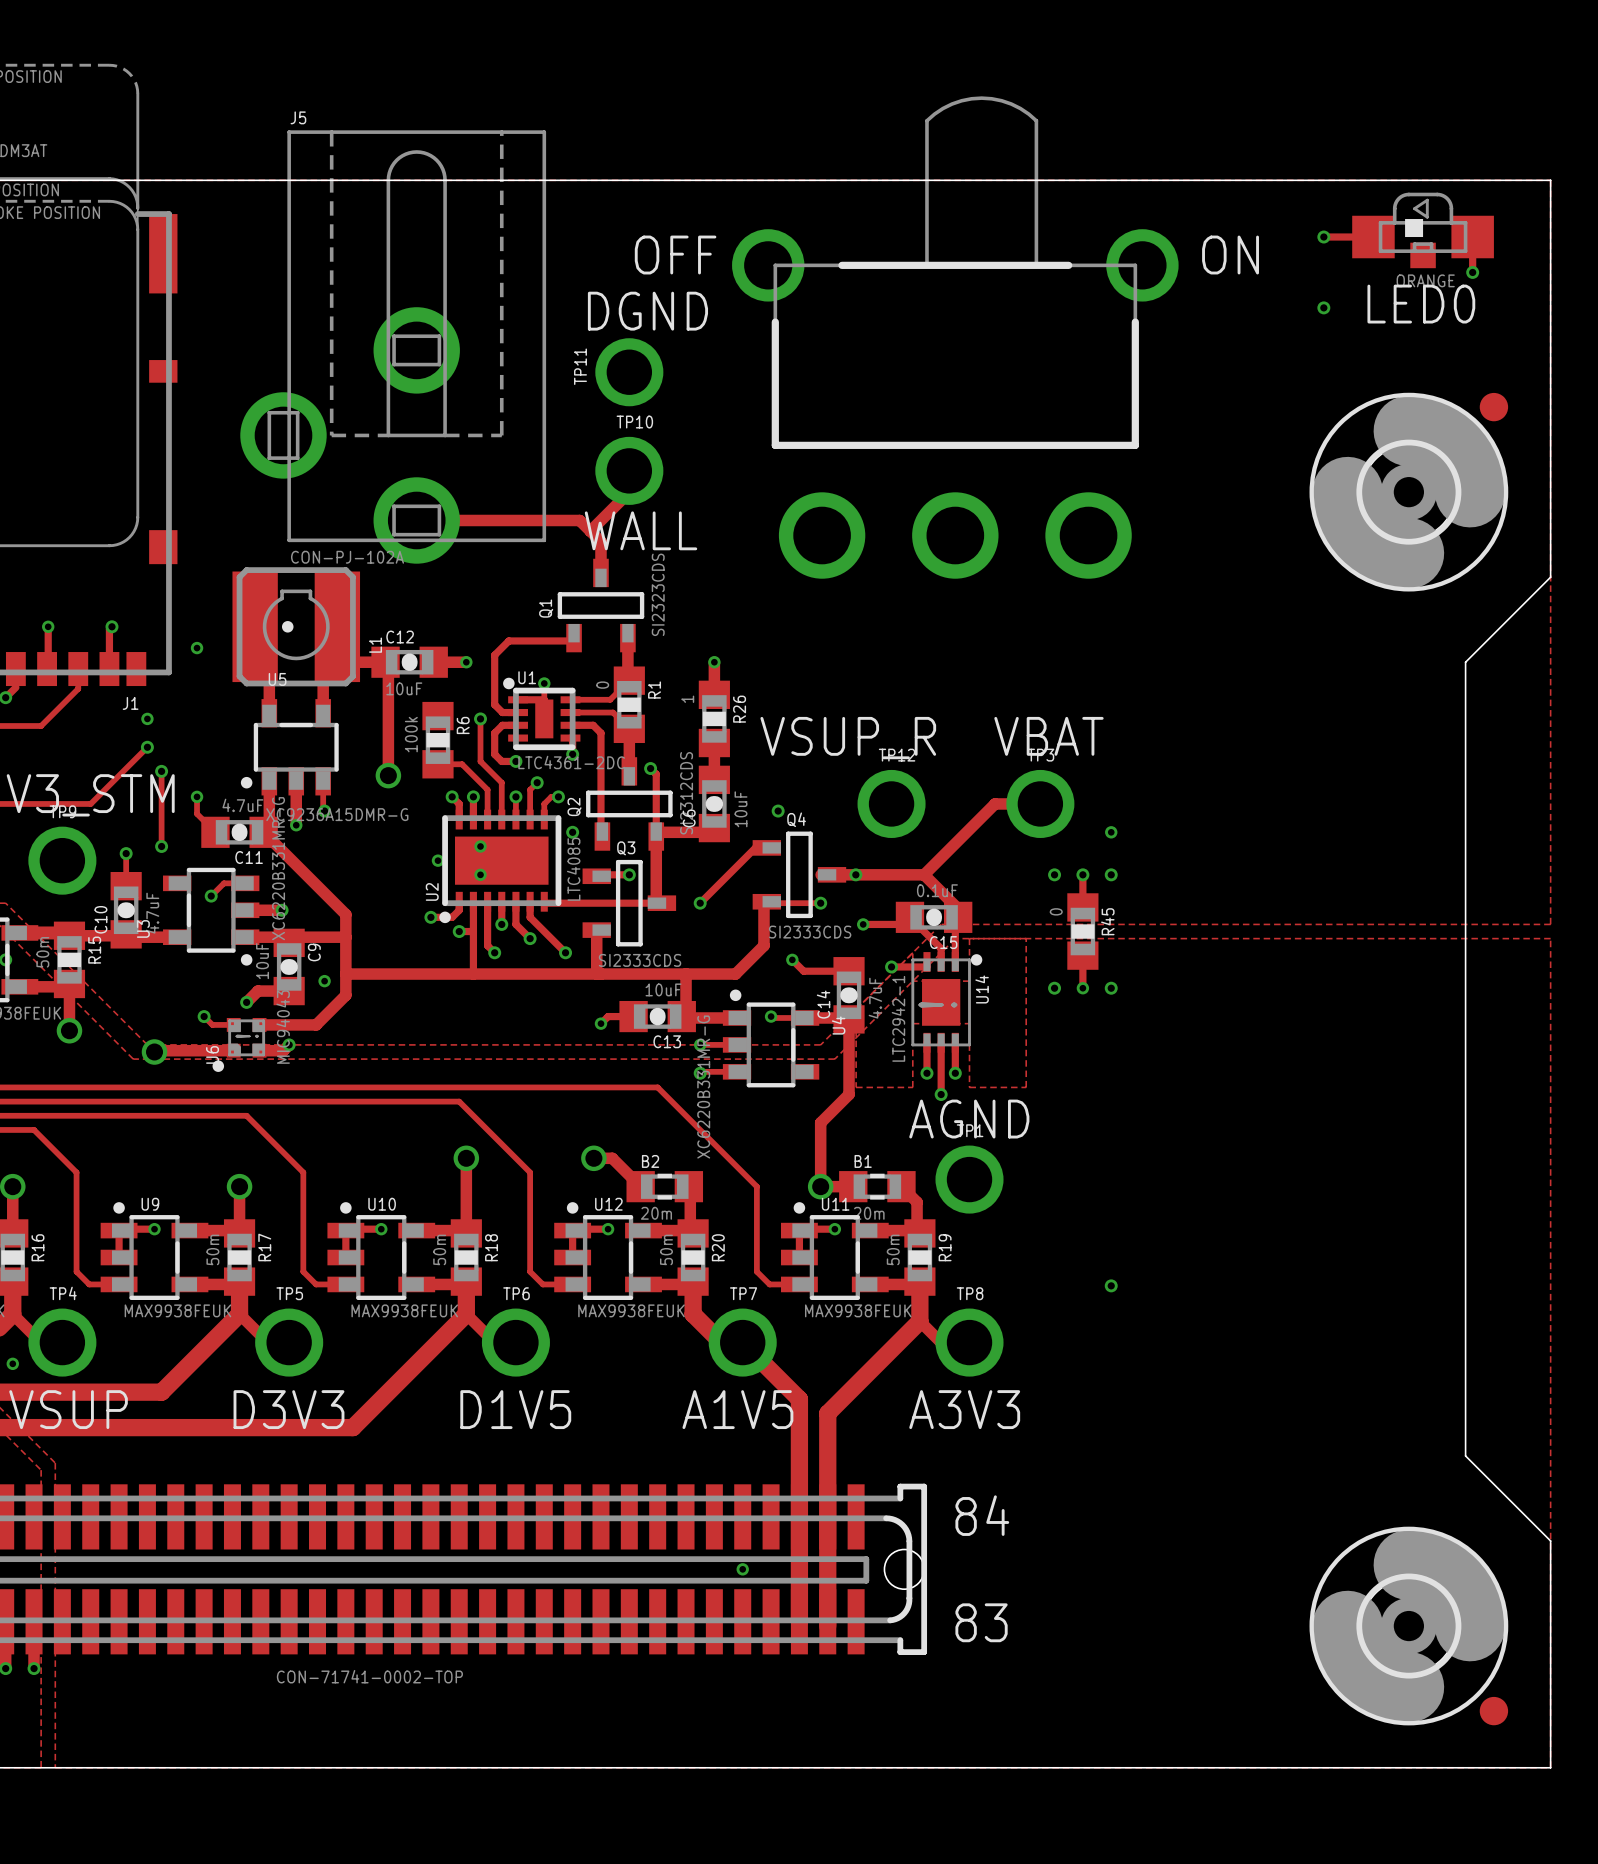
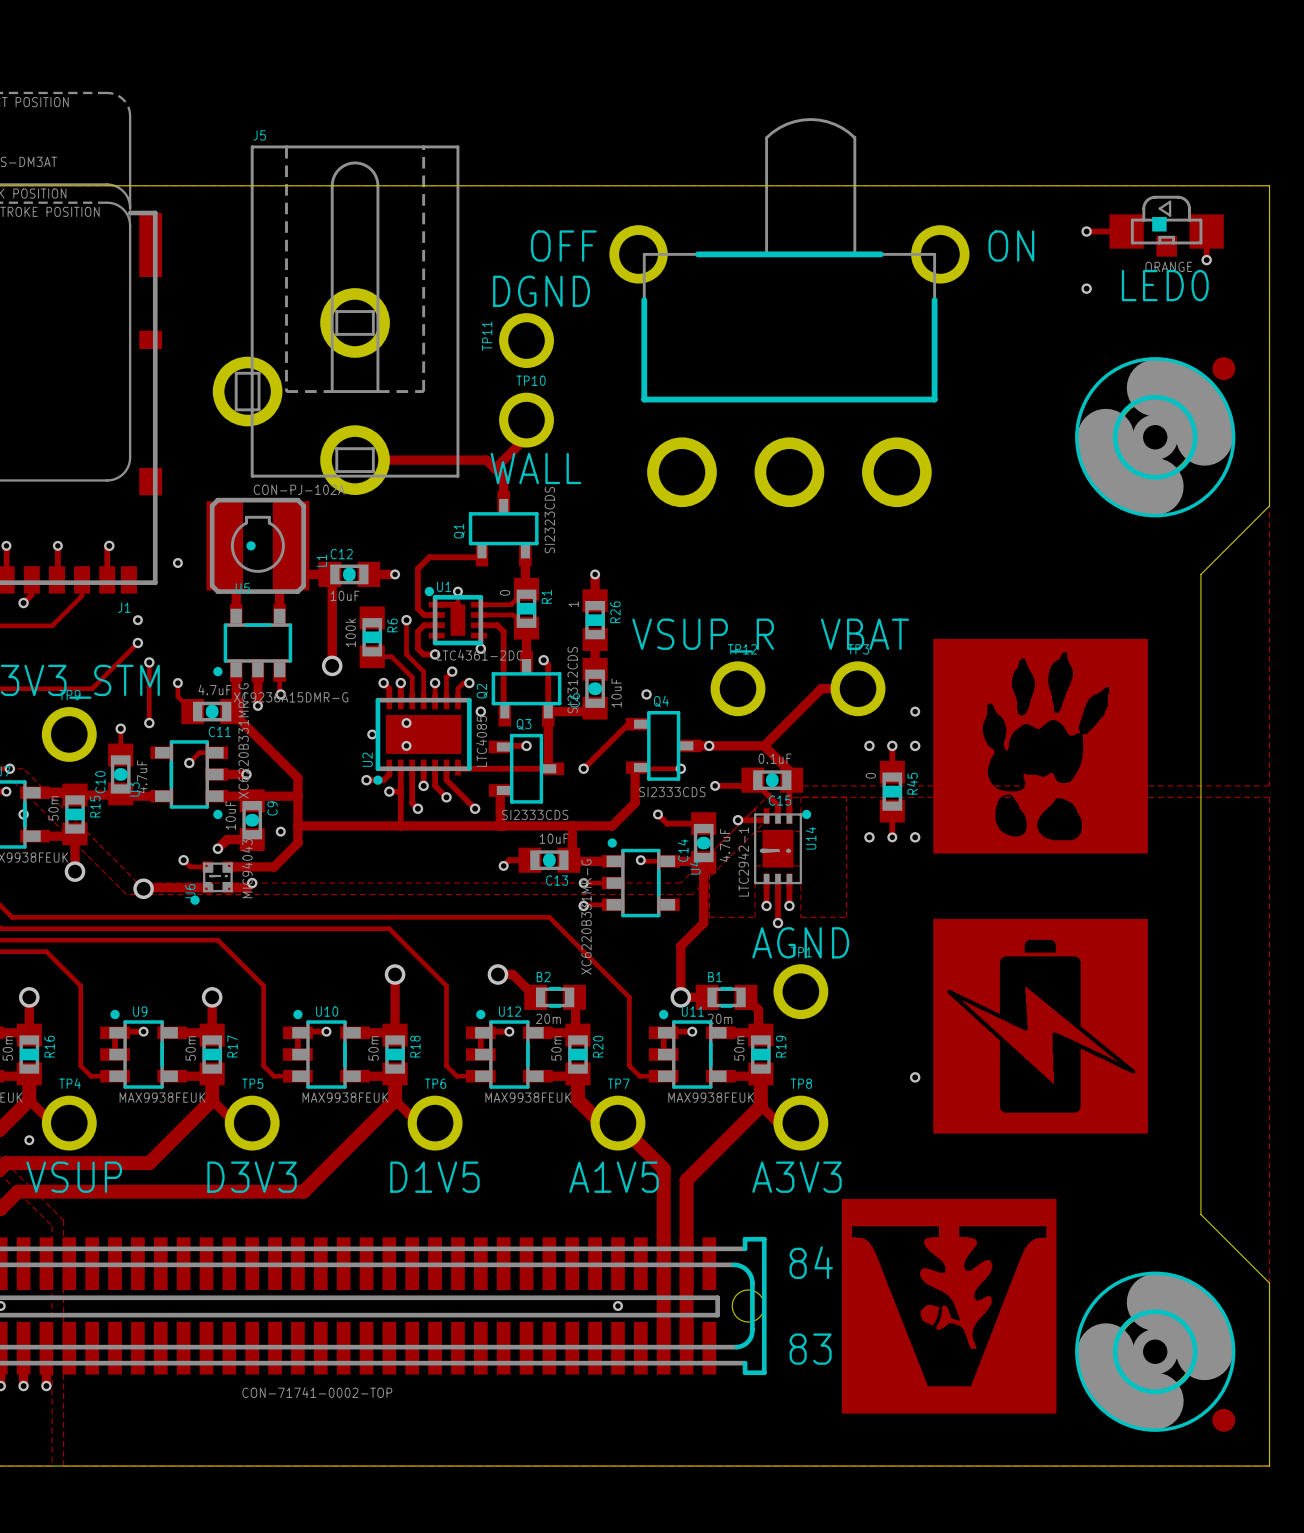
Q1 footprint: [557, 558, 645, 653] -> [468, 490, 539, 567]
drawing: none -> [933, 638, 1148, 854]
Q2 footprint: [586, 757, 673, 851] -> [491, 651, 562, 727]
Q4 footprint: [752, 831, 847, 919] -> [625, 711, 702, 781]
Q3 footprint: [582, 859, 677, 947] -> [488, 733, 565, 804]
drawing: none -> [933, 918, 1148, 1134]
drawing: none -> [841, 1198, 1057, 1414]

